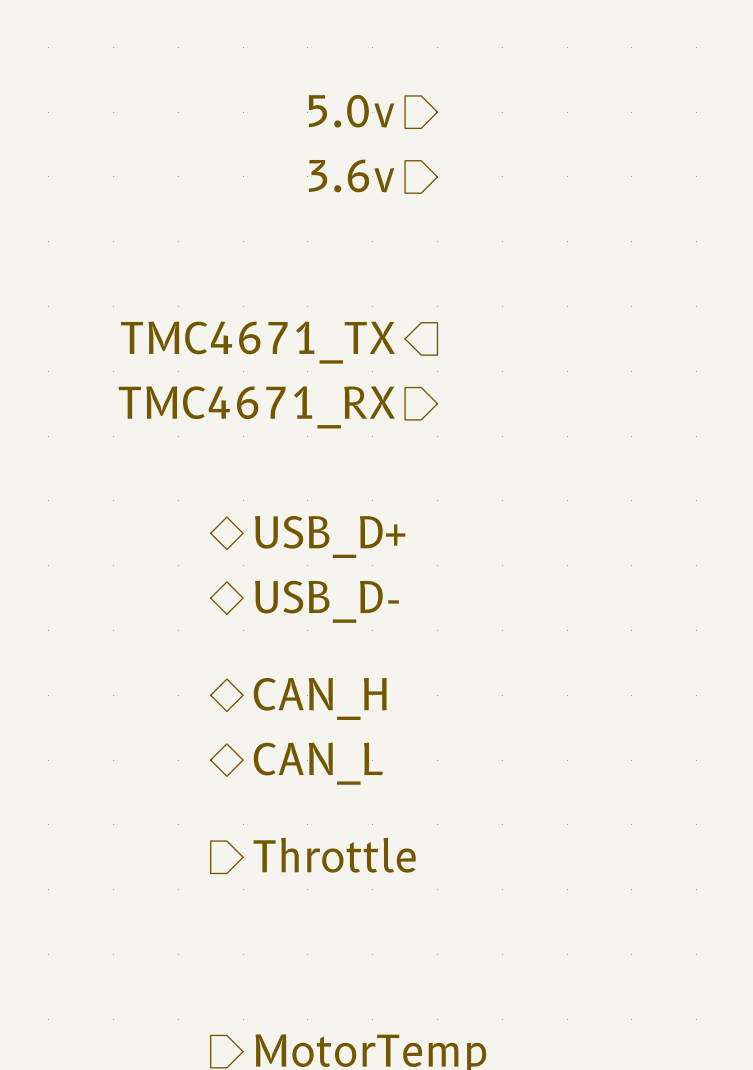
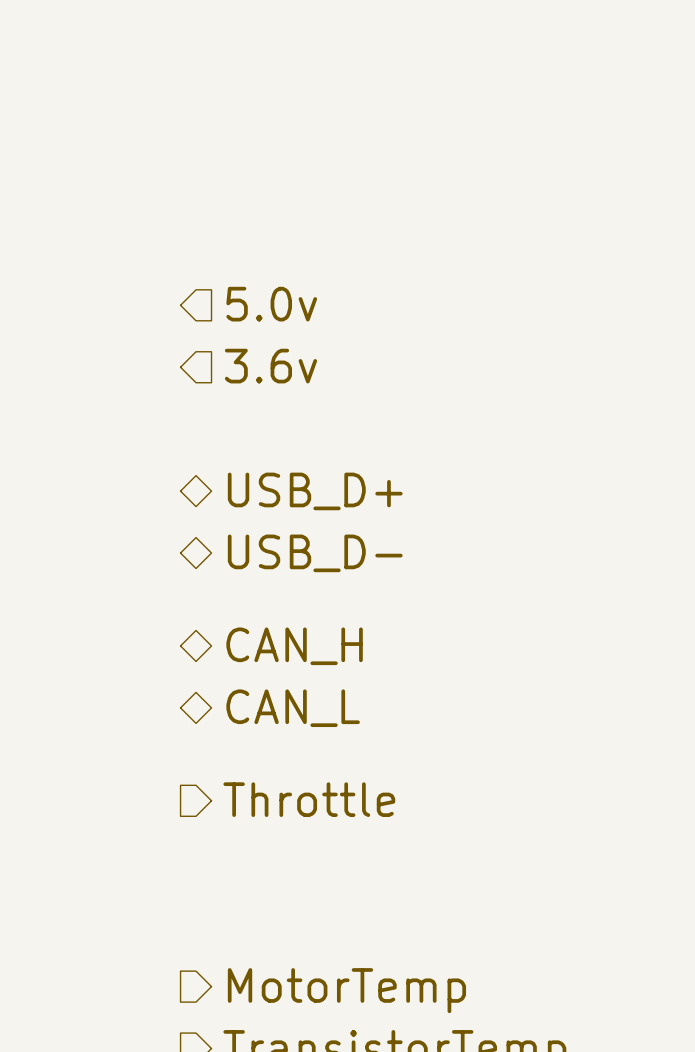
hierarchical label rotation: 0° (351, 111) -> 180° (271, 304)
hierarchical label position: 5.0v (351, 111) -> 5.0v (271, 304)
hierarchical label rotation: 0° (351, 175) -> 180° (270, 366)
hierarchical label position: 3.6v (351, 175) -> 3.6v (270, 366)
hierarchical label: TMC4671_TX (257, 342) -> none
hierarchical label: TMC4671_RX (256, 407) -> none

